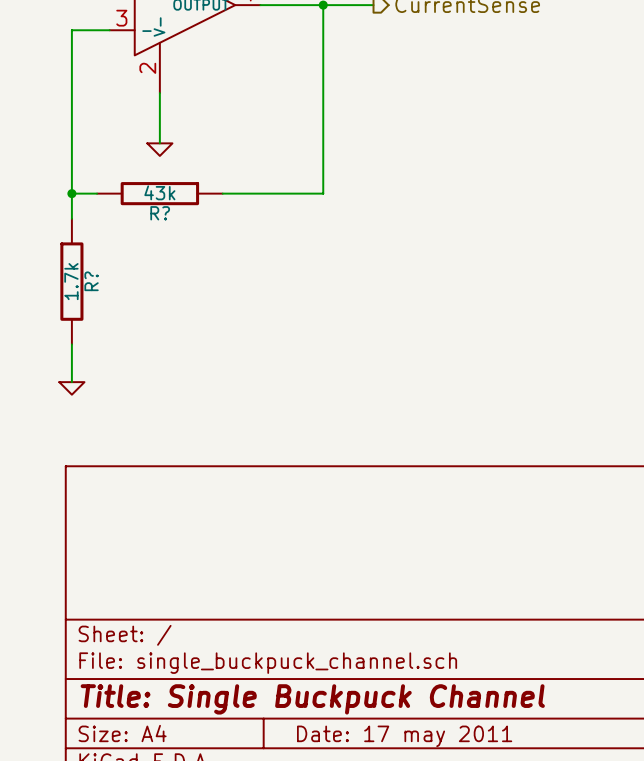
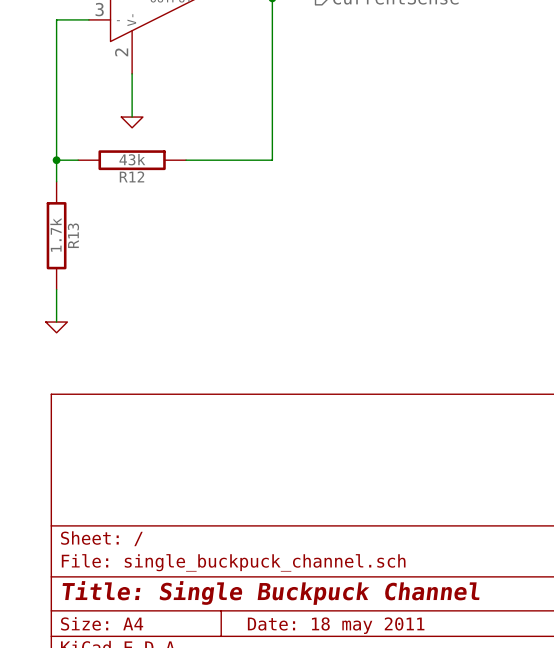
R? name: R? (160, 213) -> R12 (132, 176)
R? name: R? (91, 281) -> R13 (73, 235)
title block: Date: 17 may 2011 (404, 736) -> Date: 18 may 2011 (336, 625)

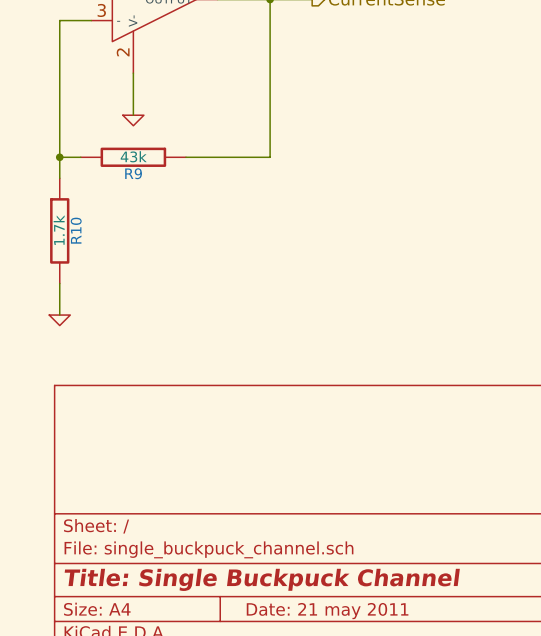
R12 name: R12 (132, 176) -> R9 (133, 173)
R13 name: R13 (73, 235) -> R10 (76, 230)
title block: Date: 18 may 2011 (336, 625) -> Date: 21 may 2011 (327, 611)

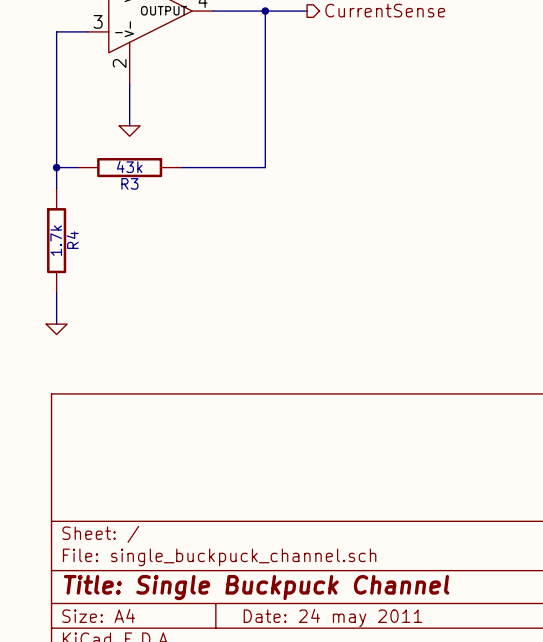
R9 name: R9 (133, 173) -> R3 (129, 183)
R10 name: R10 (76, 230) -> R4 (72, 240)
title block: Date: 21 may 2011 (327, 611) -> Date: 24 may 2011 (332, 617)

